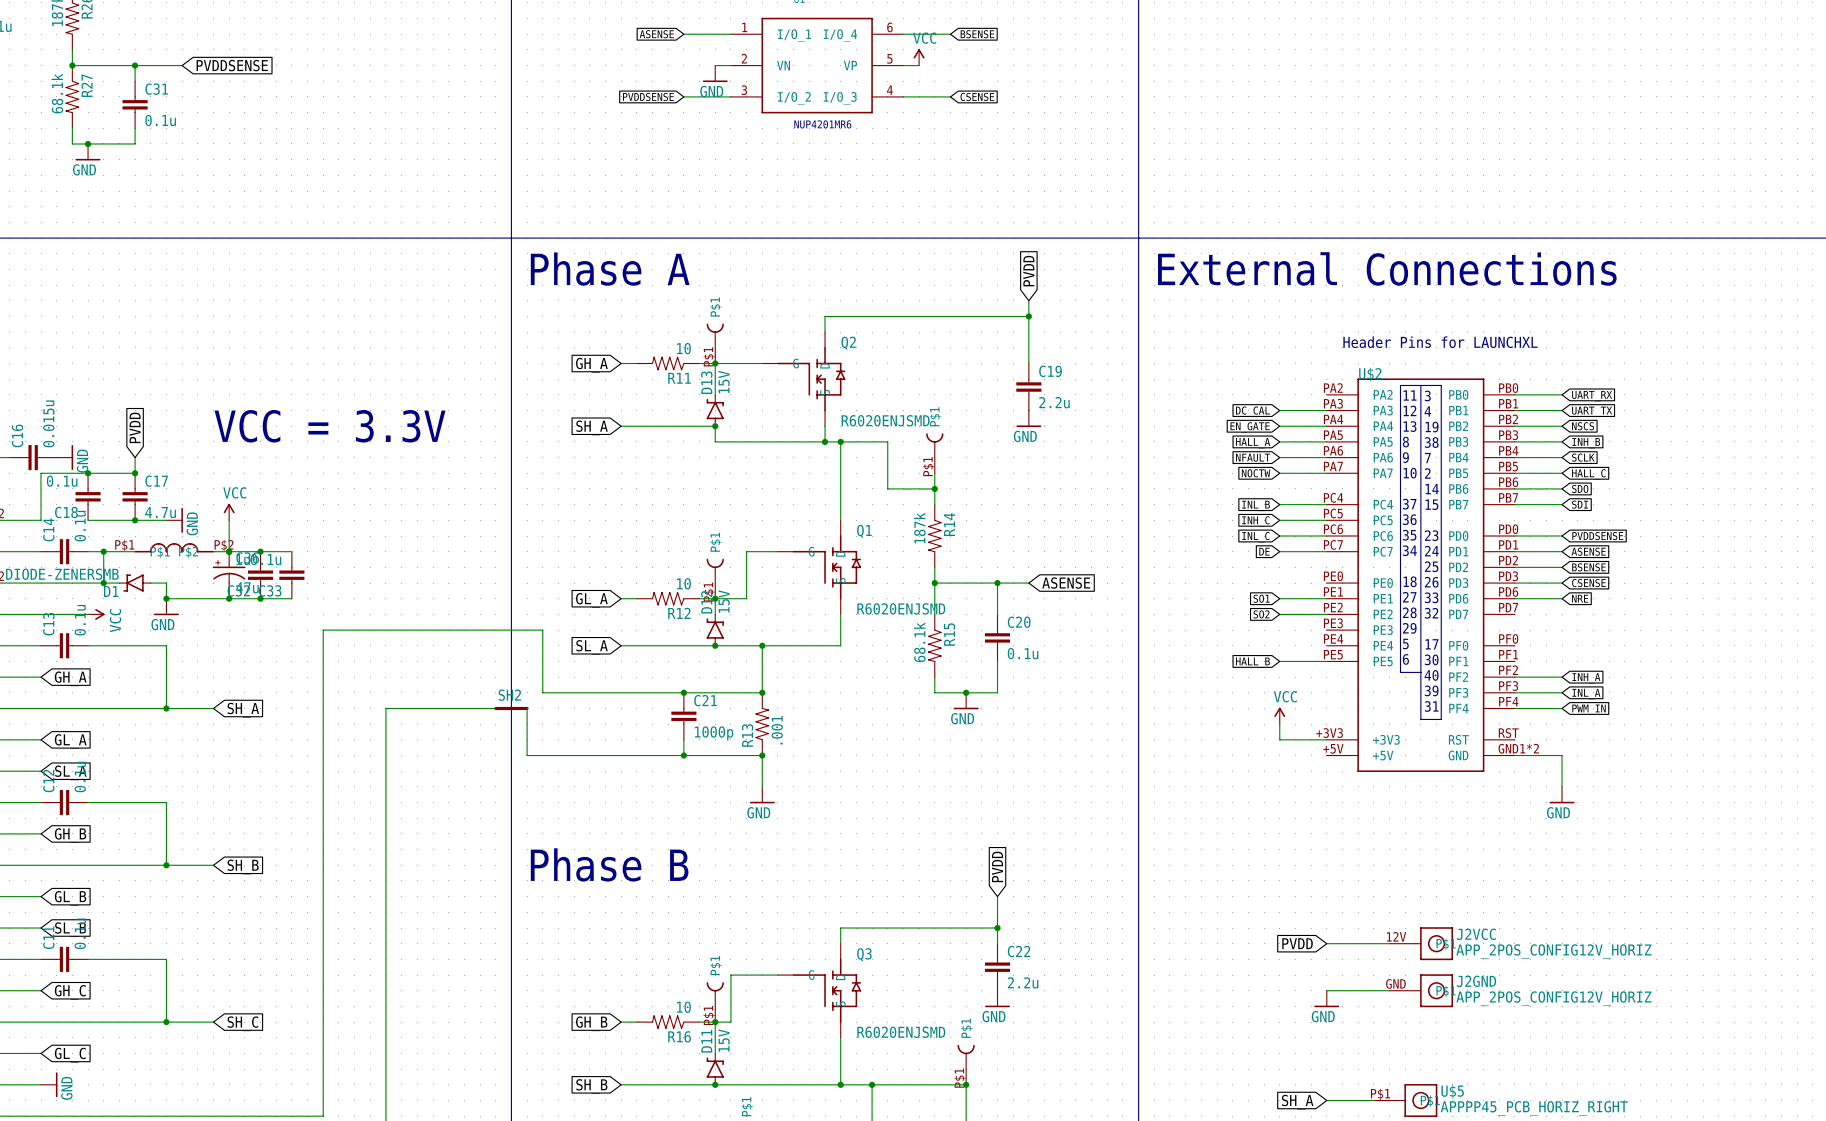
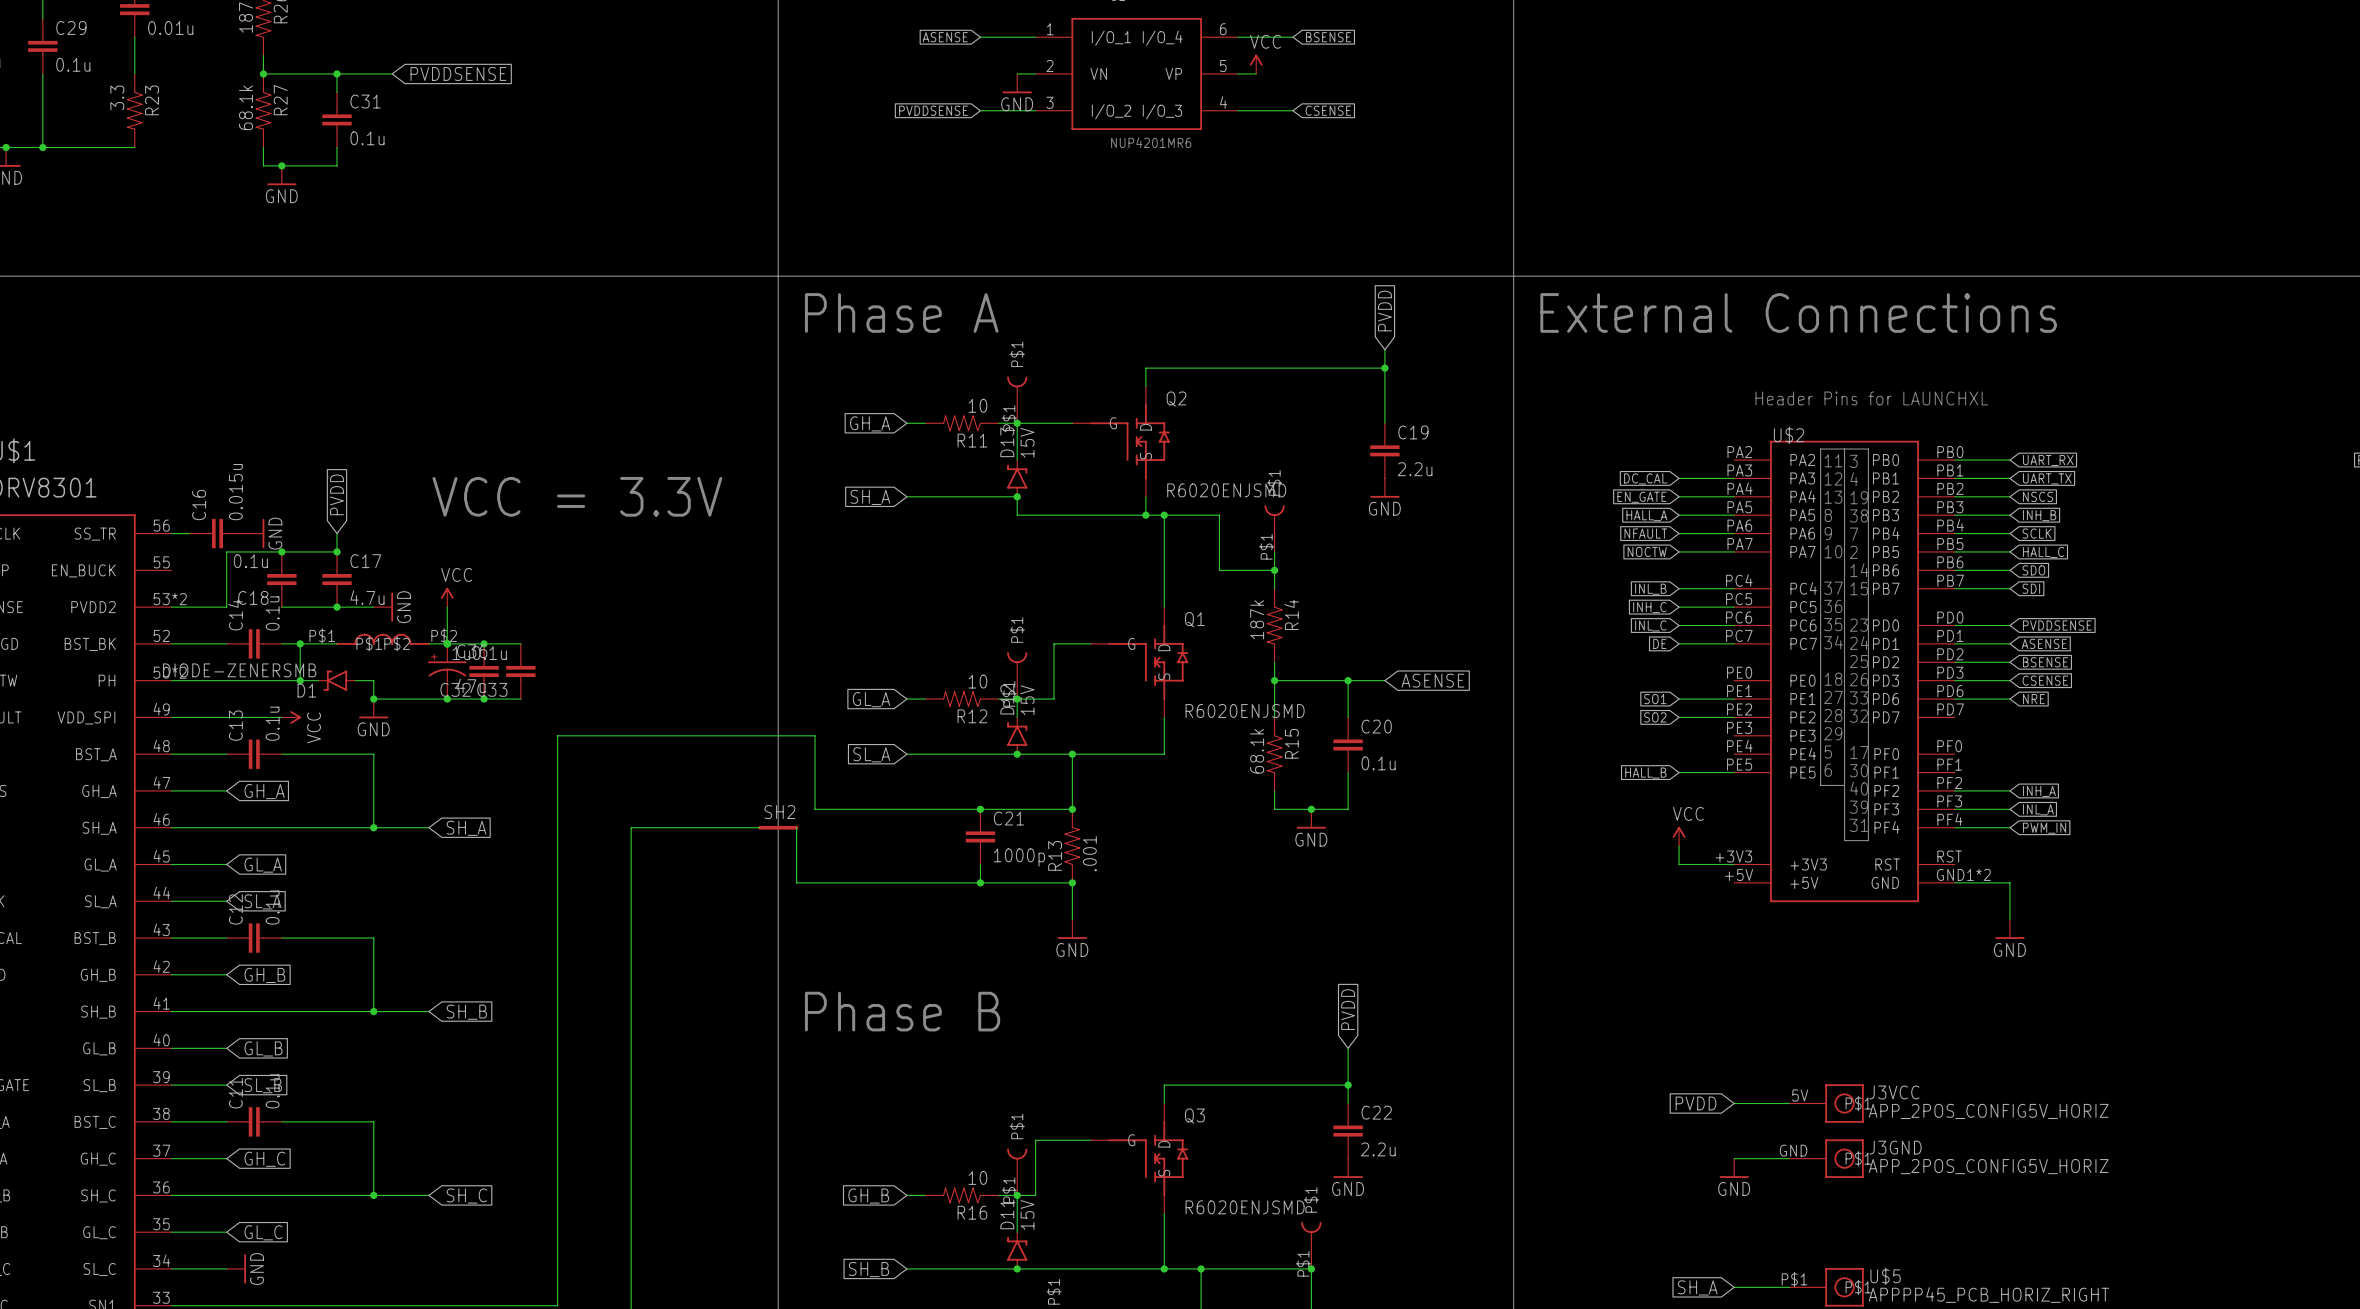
J3VCC: none -> APP_2POS_CONFIG5V_HORIZ (1826, 1103)
J2VCC: APP_2POS_CONFIG12V_HORIZ (1421, 943) -> none
J3GND: none -> APP_2POS_CONFIG5V_HORIZ (1826, 1158)
J2GND: APP_2POS_CONFIG12V_HORIZ (1421, 990) -> none

